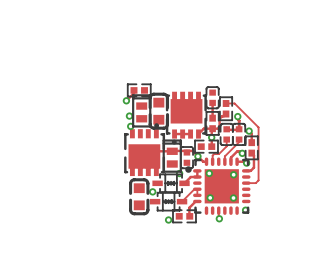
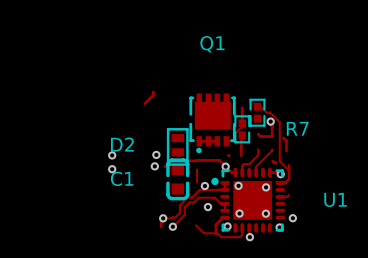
Q1 name: none -> Q1 (212, 44)
part: (139, 90) -> none
part: (212, 97) -> none
via: (126, 100) -> none
track: (226, 103) (234, 103) (258, 127) (258, 180) (252, 183) -> (288, 195) (287, 196)
track: none -> (259, 108) (270, 112) (279, 122) (279, 161) (288, 170)
part: (141, 110) -> none
part: (158, 111) -> none
track: (226, 114) (219, 118) (218, 128) (203, 128) (198, 134) -> (242, 127) (234, 133) (232, 141) (226, 141)
via: (129, 116) -> none
R7 name: none -> R7 (297, 128)
via: (130, 126) -> none
via: (249, 131) -> none
part: (226, 134) -> none
part: (239, 134) -> none
via: (211, 137) -> none
D2: none -> (177, 146)
via: none -> (112, 155)
via: none -> (156, 154)
part: (206, 146) -> none
part: (251, 147) -> none
part: (144, 149) -> none
track: (240, 151) (237, 151) (230, 157) (230, 161) -> none
via: (242, 153) -> none
via: none -> (154, 166)
part: (172, 156) -> none
part: (186, 157) -> none
via: none -> (112, 169)
track: none -> (197, 169) (197, 182)
C1: none -> (177, 179)
track: (190, 177) (184, 183) -> (217, 189) (199, 190) (192, 197) (187, 197) (179, 205) (179, 212) (175, 217) (163, 218) (161, 220) (161, 227)
part: (171, 183) -> none
U1 name: none -> U1 (335, 199)
track: (194, 189) (182, 201) -> (221, 203) (214, 197) (198, 197) (184, 207) (184, 214) (172, 226)
via: (152, 191) -> none
via: none -> (207, 207)
part: (139, 196) -> none
part: (168, 201) -> none
via: none -> (163, 218)
via: none -> (292, 218)
track: none -> (196, 225) (203, 233) (217, 233) (221, 237) (239, 237) (242, 234) (242, 227)
via: none -> (172, 226)
via: none -> (227, 226)
part: (184, 216) -> none
via: (168, 219) -> none

